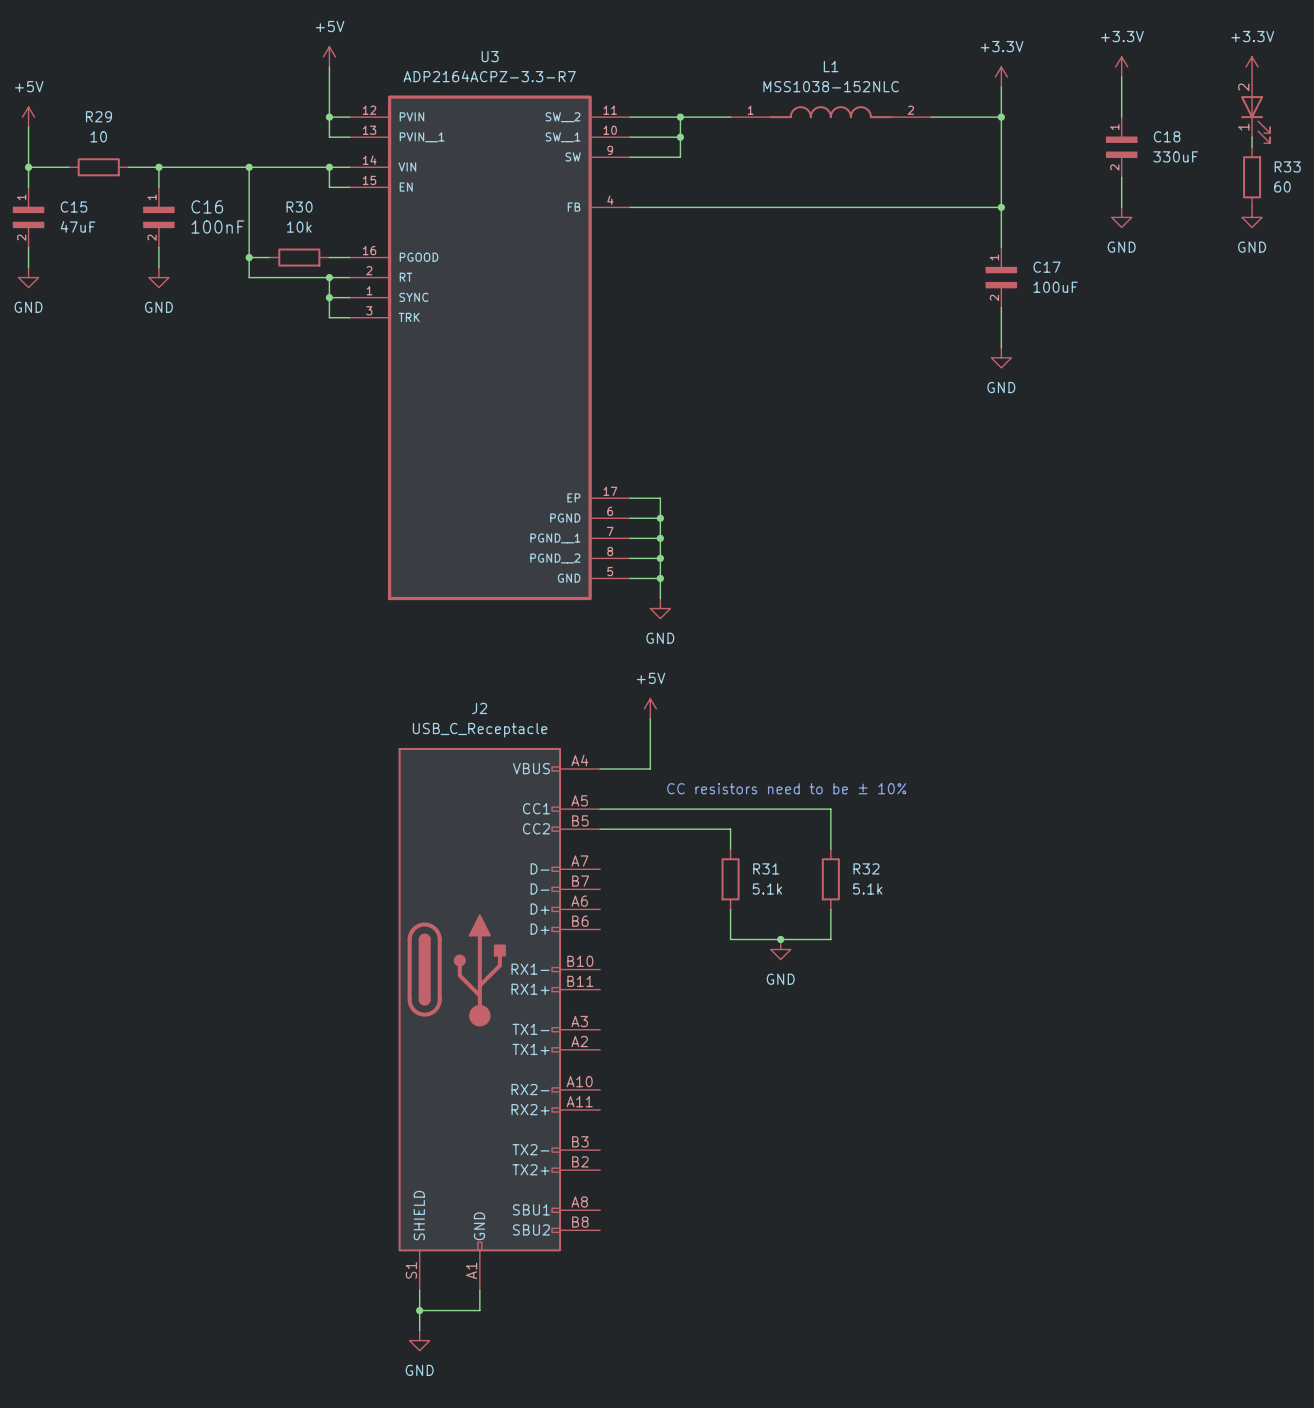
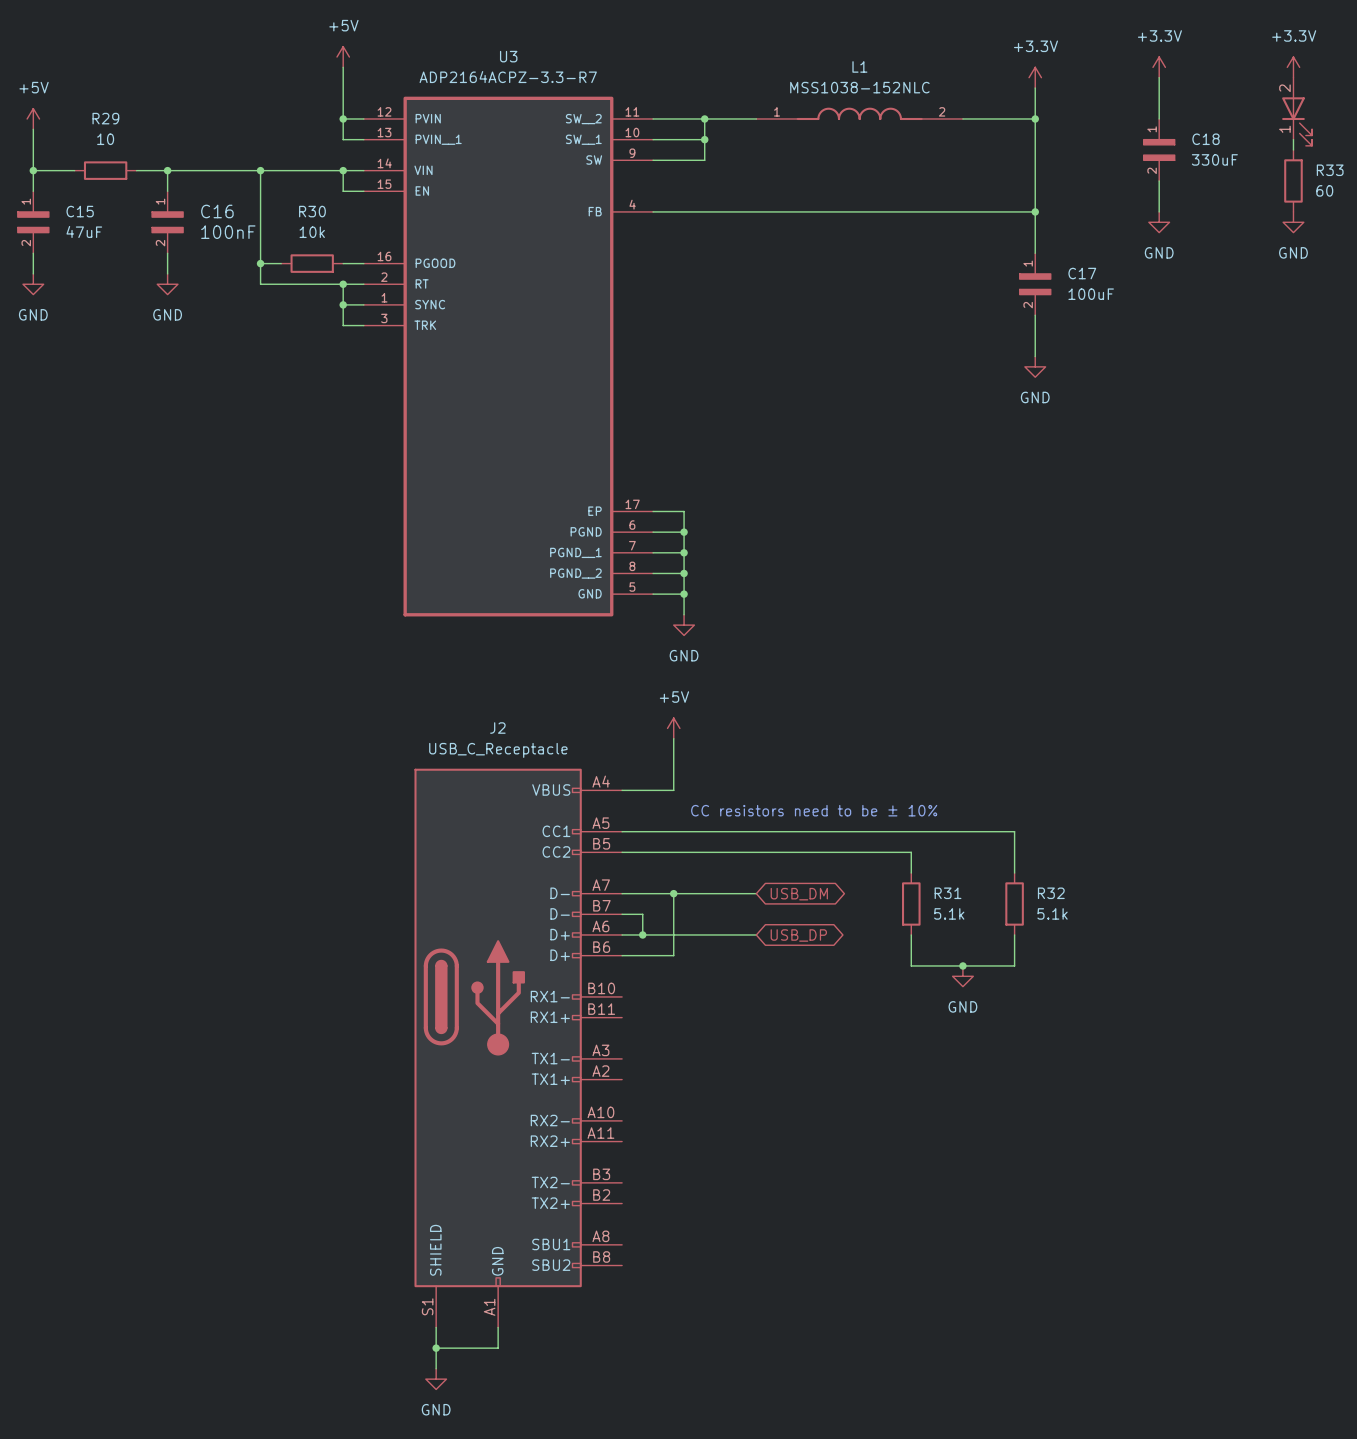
wire: (830, 809) (830, 849) -> (859, 831) (1014, 831) (1014, 873)
wire: (730, 829) (730, 849) -> (756, 852) (911, 852) (911, 873)
wire: none -> (622, 893) (756, 893)
wire: none -> (673, 893) (673, 955) (622, 955)
junction: none -> (673, 893)
global label: none -> USB_DM (799, 894)
R31 position: (730, 879) -> (911, 904)
R32 position: (830, 879) -> (1014, 904)
wire: none -> (622, 914) (642, 914) (642, 934)
junction: none -> (642, 934)
wire: (730, 909) (730, 939) (830, 939) (830, 909) -> (756, 934) (622, 934)
global label: none -> USB_DP (798, 935)
wire: none -> (911, 934) (911, 965) (1014, 965) (1014, 934)
junction: (780, 939) -> none
junction: none -> (962, 965)
power symbol position: GND (780, 949) -> GND (962, 976)

